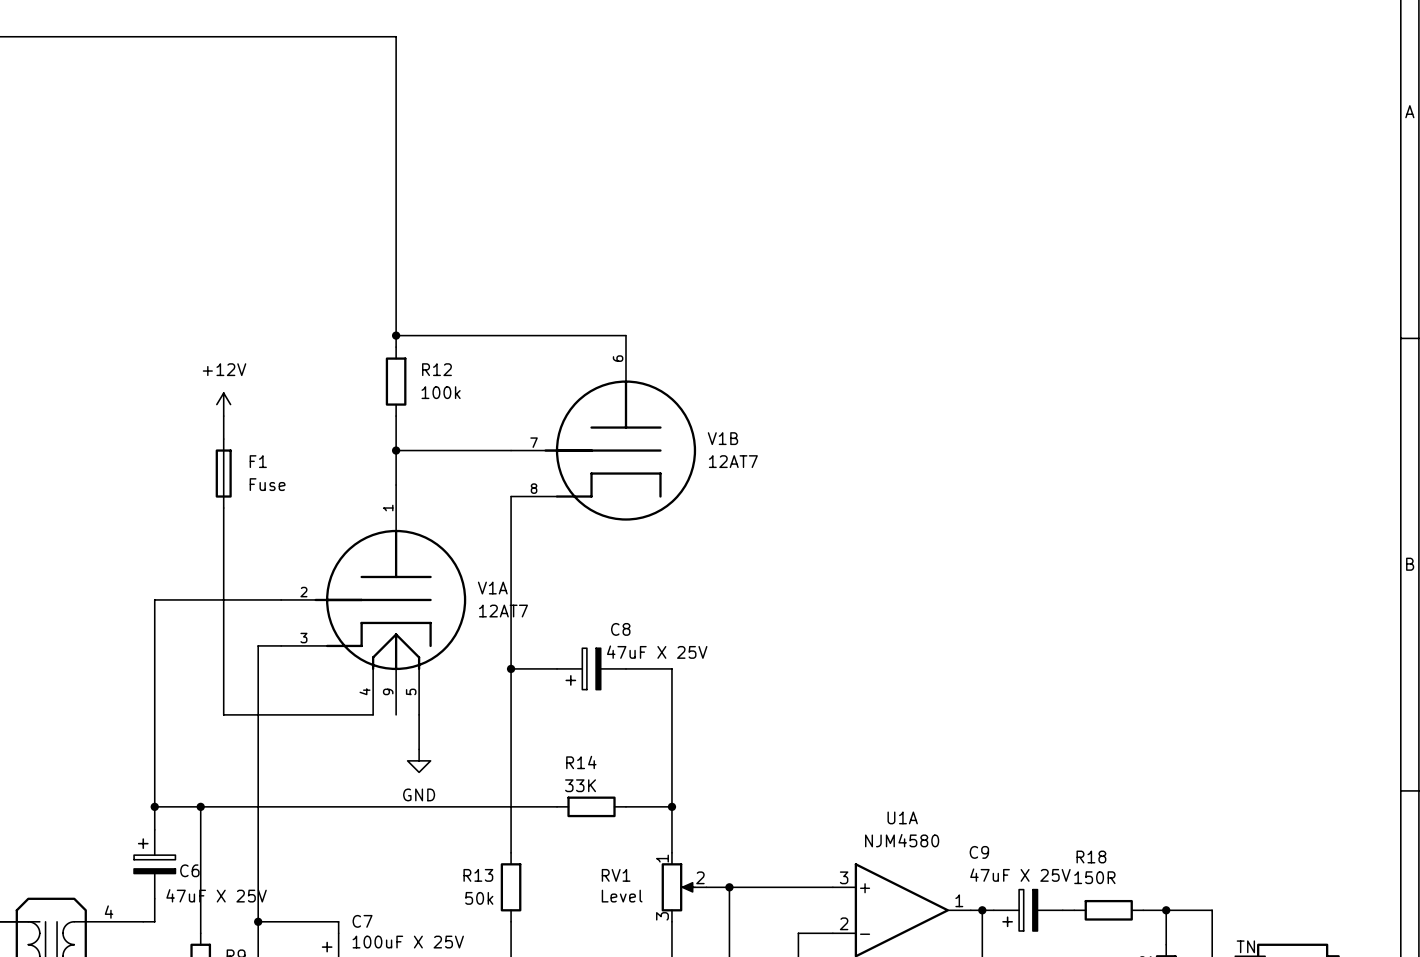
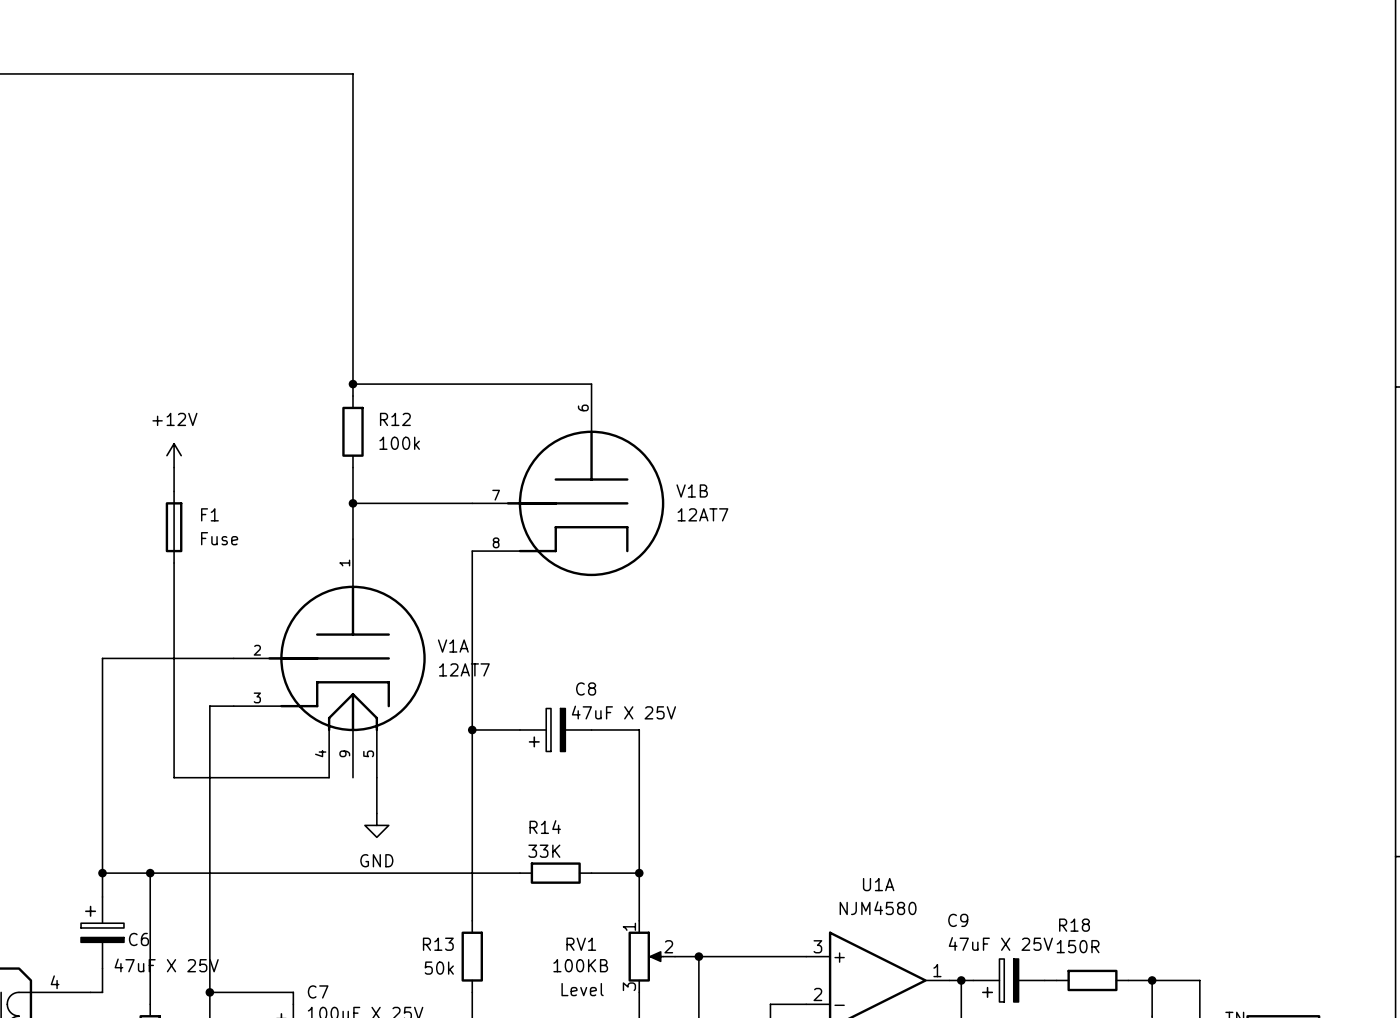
RV1 value: Level (622, 896) -> 100KB (580, 965)
text: none -> Level (582, 989)

